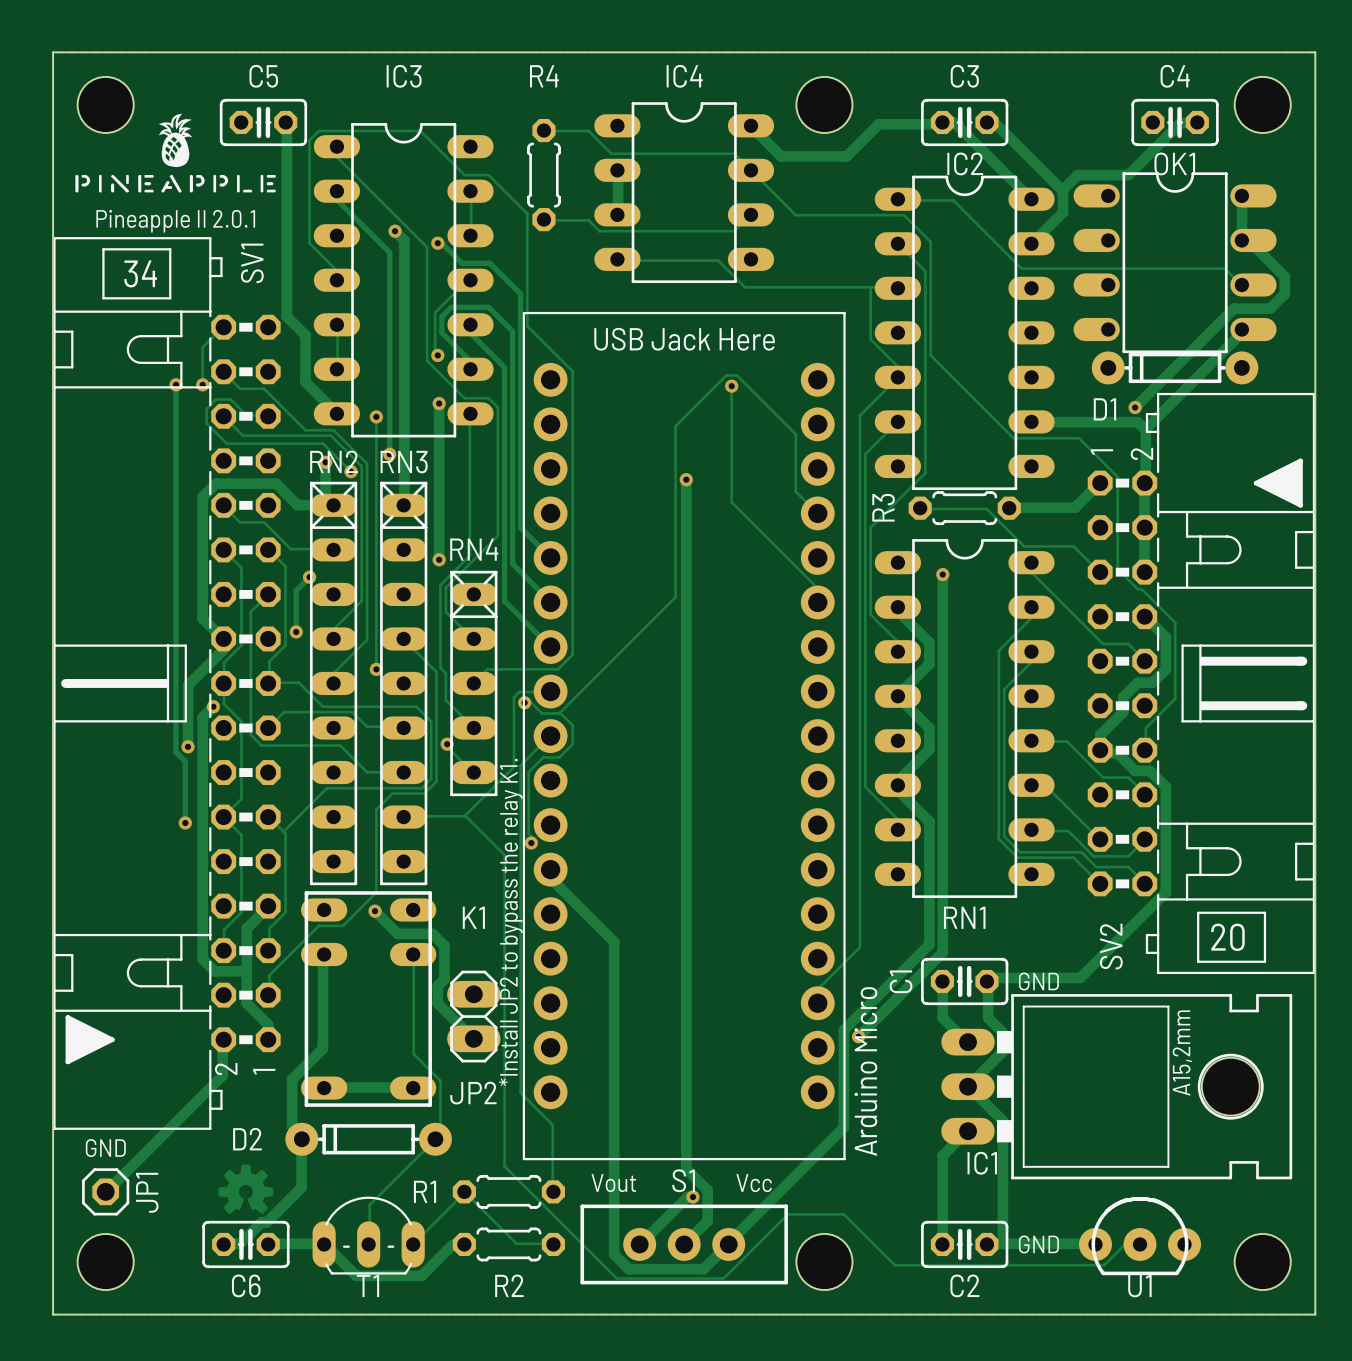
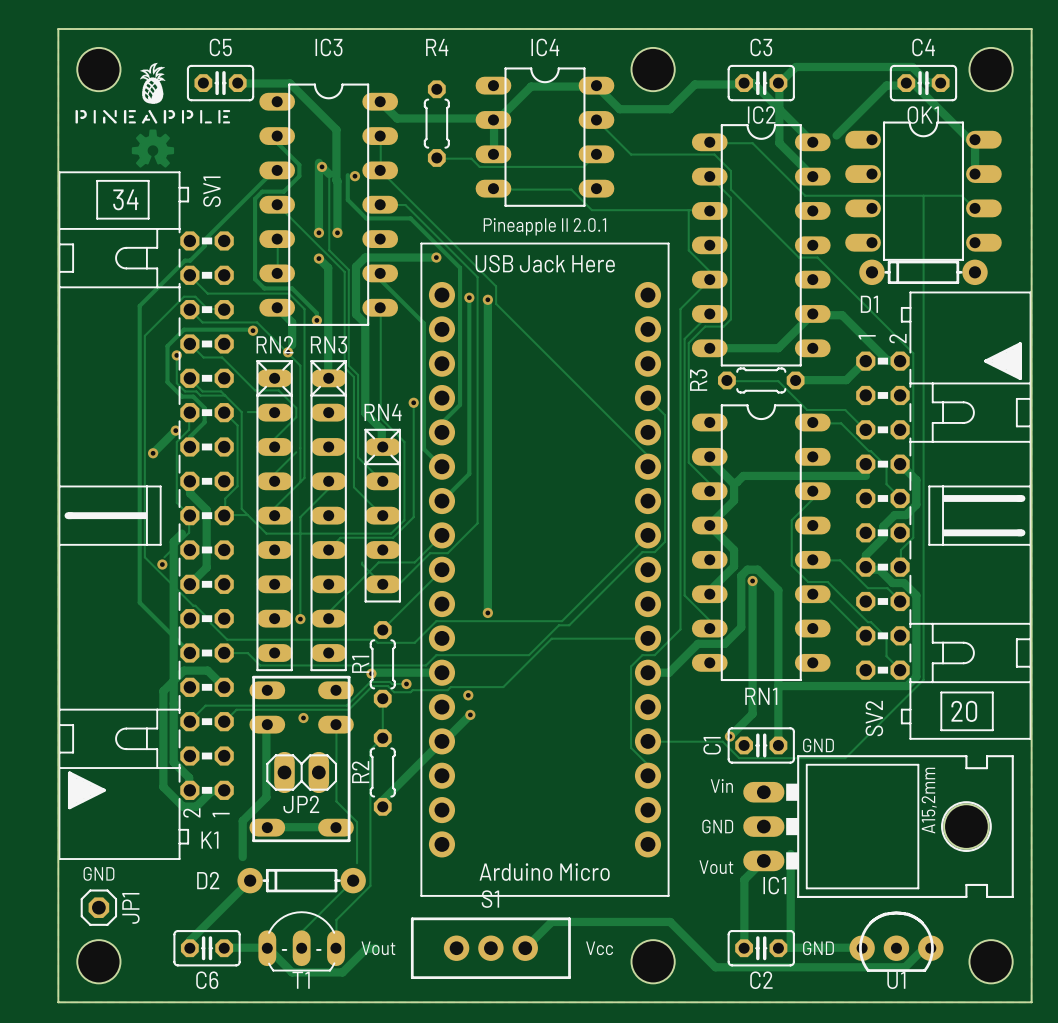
track: none -> (778, 83) (795, 66) (912, 66) (927, 82) (940, 83)
track: (1197, 122) (1180, 123) (1128, 175) (1077, 175) -> (974, 139) (968, 139) (913, 83) (886, 85) (848, 123)
track: (286, 123) (286, 316) (305, 335) (305, 382) (336, 413) -> (238, 83) (290, 83) (336, 129) (337, 232)
track: (988, 123) (994, 123) (1063, 191) (1063, 212) (1031, 243) -> (779, 83) (779, 143) (812, 176)
track: none -> (596, 85) (531, 86) (498, 119) (493, 119) (397, 118) (380, 101)
track: (543, 130) (588, 131) (611, 153) (734, 153) (751, 170) -> none
drawing position: (175, 152) -> (152, 93)
track: (337, 156) (427, 247) (427, 360) (464, 398) (488, 398) (497, 407) (497, 535) (445, 587) (445, 611) -> (329, 250) (348, 269) (348, 365) (358, 374) (358, 457) (361, 460)
drawing: none -> [131, 129, 175, 168]
text: Pineapple II 2.0.1 (175, 221) -> none
track: none -> (318, 162) (318, 232)
track: (365, 228) (389, 252) (389, 454) -> (299, 164) (299, 176) (283, 191) (262, 191) (255, 198) (255, 279) (264, 288) (292, 288) (316, 313) (316, 320)
track: none -> (277, 170) (273, 171) (204, 240) (204, 246) (190, 260) (185, 260) (139, 305) (139, 602) (189, 652)
track: none -> (380, 170) (496, 286) (496, 303) (647, 455) (647, 466)
track: (925, 236) (930, 241) (930, 355) (1013, 438) (1079, 438) (1117, 477) (1117, 569) (1137, 589) (1141, 589) (1175, 622) -> (730, 171) (730, 189) (798, 257) (817, 257) (913, 353) (913, 537)
track width: thick (404, 240) (404, 339) -> thin (329, 174) (329, 250)
track: (1241, 240) (1251, 243) (1284, 276) (1284, 293) (1270, 308) (1233, 308) (1135, 407) -> none
track: none -> (347, 175) (347, 199) (366, 218) (410, 218) (460, 267) (460, 404) (442, 422) (441, 432)
track: (437, 243) (441, 243) (461, 263) (489, 263) (520, 293) (520, 527) (550, 557) -> none
track: none -> (923, 195) (923, 468)
track: (336, 280) (336, 269) (309, 243) (309, 140) (318, 131) (420, 131) (464, 175) (488, 175) (527, 213) (527, 326) (572, 371) (572, 654) (558, 669) (487, 669) (473, 683) -> (277, 204) (344, 271) (344, 367) (353, 377) (353, 487) (382, 515)
track: (470, 280) (467, 280) (435, 312) (435, 352) (437, 355) -> (380, 204) (405, 205) (477, 277) (477, 523) (447, 553) (430, 553) (399, 584) (382, 584)
text: none -> Pineapple II 2.0.1 (544, 226)
via: none -> (318, 232)
via: none -> (337, 232)
track: (470, 324) (471, 334) (504, 367) (504, 601) (550, 647) -> none
track: (223, 327) (202, 347) (202, 384) -> none
track: (1241, 329) (1240, 334) (1145, 428) -> none
track: (404, 339) (403, 505) -> (318, 258) (328, 267) (328, 378)
text position: USB Jack Here (684, 339) -> USB Jack Here (545, 263)
track: none -> (436, 257) (365, 257) (356, 266) (356, 299)
via: none -> (436, 257)
via: none -> (318, 258)
via: (437, 355) -> none
track: (470, 369) (469, 360) (441, 332) (441, 316) (451, 307) (488, 307) (512, 331) (512, 563) (550, 602) -> (380, 273) (380, 280) (424, 323) (424, 449) (441, 466)
track: (175, 384) (175, 752) (185, 761) (185, 822) -> none
via: (175, 384) -> none
via: (202, 384) -> none
track: (731, 386) (731, 502) (817, 587) (817, 602) -> none
via: (731, 386) -> none
track: (240, 388) (264, 388) (305, 430) (333, 430) (367, 463) (367, 489) -> (202, 322) (257, 322) (300, 365)
track: none -> (202, 288) (207, 293) (289, 293) (304, 309) (304, 477) (300, 482)
track: none -> (469, 297) (469, 473) (441, 501)
via: none -> (469, 297)
via: (439, 403) -> none
track: none -> (487, 299) (487, 612)
via: none -> (487, 299)
via: (1135, 407) -> none
track: (206, 408) (206, 423) (226, 443) (322, 443) (350, 471) -> (176, 303) (144, 335) (144, 557) (227, 639) (374, 639) (377, 642) (414, 642) (436, 621) (562, 621) (647, 535)
track: none -> (277, 307) (292, 322) (292, 345)
track: (470, 413) (469, 555) (440, 585) (440, 668) (445, 673) (445, 700) (473, 728) -> (380, 307) (380, 418) (404, 441) (404, 520) (391, 533) (338, 533)
track: (376, 416) (376, 669) -> none
via: (376, 416) -> none
track: (1031, 421) (1137, 422) (1145, 428) -> none
track: (439, 422) (439, 559) -> (356, 314) (365, 323) (365, 413) (381, 429) (382, 446)
track: (925, 428) (925, 473) (870, 527) -> (730, 319) (723, 326) (705, 326) (688, 343) (688, 395)
track: (1145, 428) (1144, 572) -> none
via: none -> (316, 320)
track: (240, 432) (242, 435) (330, 435) (361, 466) (361, 543) -> (189, 343) (203, 357) (222, 357) (255, 390) (278, 390) (296, 407)
track: none -> (253, 330) (184, 329) (167, 346) (167, 382) (181, 396) (193, 396) (204, 407) (204, 422) (190, 436) (189, 446)
via: (389, 454) -> none
track: (325, 462) (325, 501) (333, 505) (297, 505) (276, 483) (216, 483) (202, 497) (202, 618) (223, 638) (222, 650) (188, 685) (188, 746) -> none
via position: (325, 462) -> (253, 330)
track: none -> (709, 348) (778, 348) (812, 313) (842, 315) (887, 360) (900, 361)
track: none -> (176, 355) (176, 383) (185, 391) (196, 391) (200, 395) (225, 395)
via: none -> (176, 355)
track: (686, 479) (686, 1168) (707, 1190) (707, 1221) (684, 1244) -> none
via: (686, 479) -> none
track: (817, 513) (795, 491) (795, 434) (737, 375) (726, 375) (675, 426) (675, 597) (559, 713) (542, 713) (531, 702) (524, 702) -> none
track: none -> (647, 398) (665, 415) (665, 541) (654, 552) (642, 552) (569, 625) (558, 625) (529, 655) (436, 655) (426, 665) (260, 665) (247, 653) (224, 652)
via: none -> (413, 402)
track: (223, 549) (241, 567) (241, 645) (224, 662) (223, 683) (224, 704) (241, 721) (241, 798) (223, 817) (241, 835) (241, 912) (224, 929) (224, 949) -> (189, 412) (189, 429) (176, 441) (176, 502) (189, 515) (189, 532) (164, 557)
track: (290, 549) (298, 549) -> (241, 412) (241, 508) (247, 515)
track: (361, 555) (361, 601) -> (296, 417) (274, 438) (274, 446)
via: (439, 559) -> none
track: (1032, 563) (1032, 573) (1103, 643) (1128, 643) -> (813, 423) (841, 423) (886, 466) (887, 485)
track: none -> (175, 430) (153, 453)
via: none -> (175, 430)
track: (942, 574) (942, 952) (858, 1036) -> none
via: (942, 574) -> none
track: (309, 577) (296, 590) (296, 631) -> none
via: (309, 577) -> none
track: (268, 594) (250, 611) (250, 734) (261, 745) (340, 745) (367, 772) (403, 772) -> none
via: none -> (153, 453)
track: (1031, 607) (1030, 618) (998, 650) (998, 839) (1017, 857) (1073, 857) (1100, 883) -> none
via: (296, 631) -> none
track: none -> (865, 475) (743, 475) (734, 484)
track: none -> (189, 481) (190, 493) (206, 509) (206, 567) (189, 584)
track: (403, 638) (436, 672) (436, 781) (424, 793) (392, 793) (376, 809) (376, 892) (342, 925) (318, 925) (269, 975) (268, 995) -> (328, 481) (328, 489) (300, 517) (300, 619)
via: (376, 669) -> none
track: (550, 691) (519, 692) (513, 697) (513, 766) (464, 816) (404, 816) -> (441, 535) (414, 562) (378, 562) (329, 611) (329, 618)
track: (1175, 698) (1161, 712) -> (923, 527) (923, 679) (845, 758) (739, 758) (722, 741) (647, 741)
via: (524, 702) -> none
via: (213, 706) -> none
track: (416, 706) (431, 721) (431, 778) (421, 788) (326, 788) (283, 831) -> none
track: (560, 712) (572, 725) (572, 744) (559, 757) (543, 757) (528, 772) (528, 833) (531, 836) (531, 843) -> none
track: (268, 728) (284, 712) (352, 712) (367, 726) (403, 728) -> (413, 402) (413, 517) (393, 537) (340, 537) (328, 549)
track: (550, 736) (520, 765) (520, 1092) (552, 1124) (553, 1191) -> none
part position: (684, 736) -> (544, 569)
via: (447, 744) -> none
track: (1004, 748) (1004, 836) (1020, 852) (1081, 852) (1096, 867) (1128, 867) -> (791, 565) (808, 582) (827, 582) (867, 622) (871, 622) (886, 637) (887, 657)
track: none -> (441, 569) (382, 630)
track: none -> (752, 581) (752, 713) (729, 736)
via: none -> (752, 581)
track: (897, 785) (901, 789) (901, 793) (929, 821) (929, 944) (843, 1030) (843, 1127) (703, 1269) (628, 1269) (614, 1254) (614, 941) (551, 879) (550, 869) -> none
via: none -> (487, 612)
track: (465, 815) (504, 855) (504, 1166) (616, 1278) (723, 1278) (787, 1214) (843, 1214) (894, 1265) (1104, 1265) (1124, 1245) (1140, 1244) -> none
track: (268, 817) (285, 833) (285, 912) (269, 928) (269, 949) -> (647, 638) (551, 638) (503, 687) (450, 687) (447, 690) (394, 692) (387, 686) (372, 686) (348, 709) (236, 709) (225, 721)
via: none -> (300, 619)
via: (185, 822) -> none
track: (1031, 829) (1068, 831) (1093, 856) (1128, 856) (1144, 839) -> none
track: (859, 831) (859, 947) (818, 988) (817, 1003) -> (680, 629) (654, 655) (642, 655) (631, 666) (631, 747) (647, 764) (647, 775)
via: (531, 843) -> none
track: none -> (441, 672) (371, 673)
track: none -> (647, 672) (669, 672) (698, 643) (724, 643) (741, 627) (741, 575) (747, 569) (757, 569) (778, 590) (778, 745)
via: none -> (371, 673)
track: none -> (406, 684) (370, 681) (346, 705) (205, 705) (190, 721)
via: none -> (406, 684)
track: (1153, 904) (1080, 977) (992, 977) (986, 981) (988, 1018) (1002, 1032) (1002, 1051) (968, 1086) (1002, 1122) -> (907, 686) (778, 686)
track: (268, 906) (246, 928) (246, 1003) (268, 1024) (268, 1039) -> (224, 687) (207, 670) (184, 670) (163, 691) (163, 787) (182, 806) (196, 806) (211, 791) (224, 790)
track: (375, 911) (397, 933) (432, 933) (444, 945) (444, 979) (437, 985) (437, 1003) (473, 1038) -> none
via position: (375, 911) -> (303, 718)
via: none -> (468, 695)
K1 name position: K1 (473, 917) -> K1 (209, 840)
text: *Install JP2 to bypass the relay K1. (510, 922) -> none
track: none -> (470, 714) (382, 800) (382, 806)
via: none -> (470, 714)
track: (202, 959) (214, 971) (246, 971) -> (173, 728) (173, 762) (189, 777) (189, 790)
track: (942, 981) (942, 1018) (968, 1042) -> none
JP2 rotation: 0° (473, 1016) -> 90° clockwise (301, 772)
JP2 position: (473, 1016) -> (301, 772)
text: none -> Vin (721, 785)
via position: (858, 1036) -> (729, 736)
track: (223, 1039) (222, 1075) (105, 1191) -> none
text rotation: 0° (865, 1071) -> 90° clockwise (544, 872)
text: none -> GND (717, 826)
track: (292, 1126) (300, 1134) (301, 1139) (301, 1187) (266, 1222) (261, 1222) (240, 1243) (224, 1243) -> (249, 880) (190, 940) (190, 947)
track: (440, 1134) (369, 1205) (369, 1222) -> (352, 880) (302, 931)
D2 position: (368, 1139) -> (301, 880)
text: none -> Vout (716, 867)
drawing: [218, 1164, 274, 1214] -> none
text position: Vout (613, 1183) -> Vout (378, 948)
text position: Vcc (754, 1183) -> Vcc (599, 948)
R1 name position: R1 (425, 1191) -> R1 (360, 664)
R1 rotation: 0° (508, 1191) -> 90° clockwise (382, 664)
R1 position: (508, 1191) -> (382, 664)
track: (692, 1197) (687, 1197) (639, 1244) -> none
via: (692, 1197) -> none
track: (413, 1243) (464, 1191) (516, 1243) (553, 1244) -> (336, 947) (336, 919) (370, 885) (370, 749) (382, 738) (382, 698)
R2 rotation: 0° (508, 1244) -> 90° clockwise (382, 772)
R2 position: (508, 1244) -> (382, 772)
track: none -> (525, 948) (551, 921) (670, 921) (715, 967) (905, 967) (923, 948) (930, 948)
S1 position: (684, 1244) -> (490, 948)

